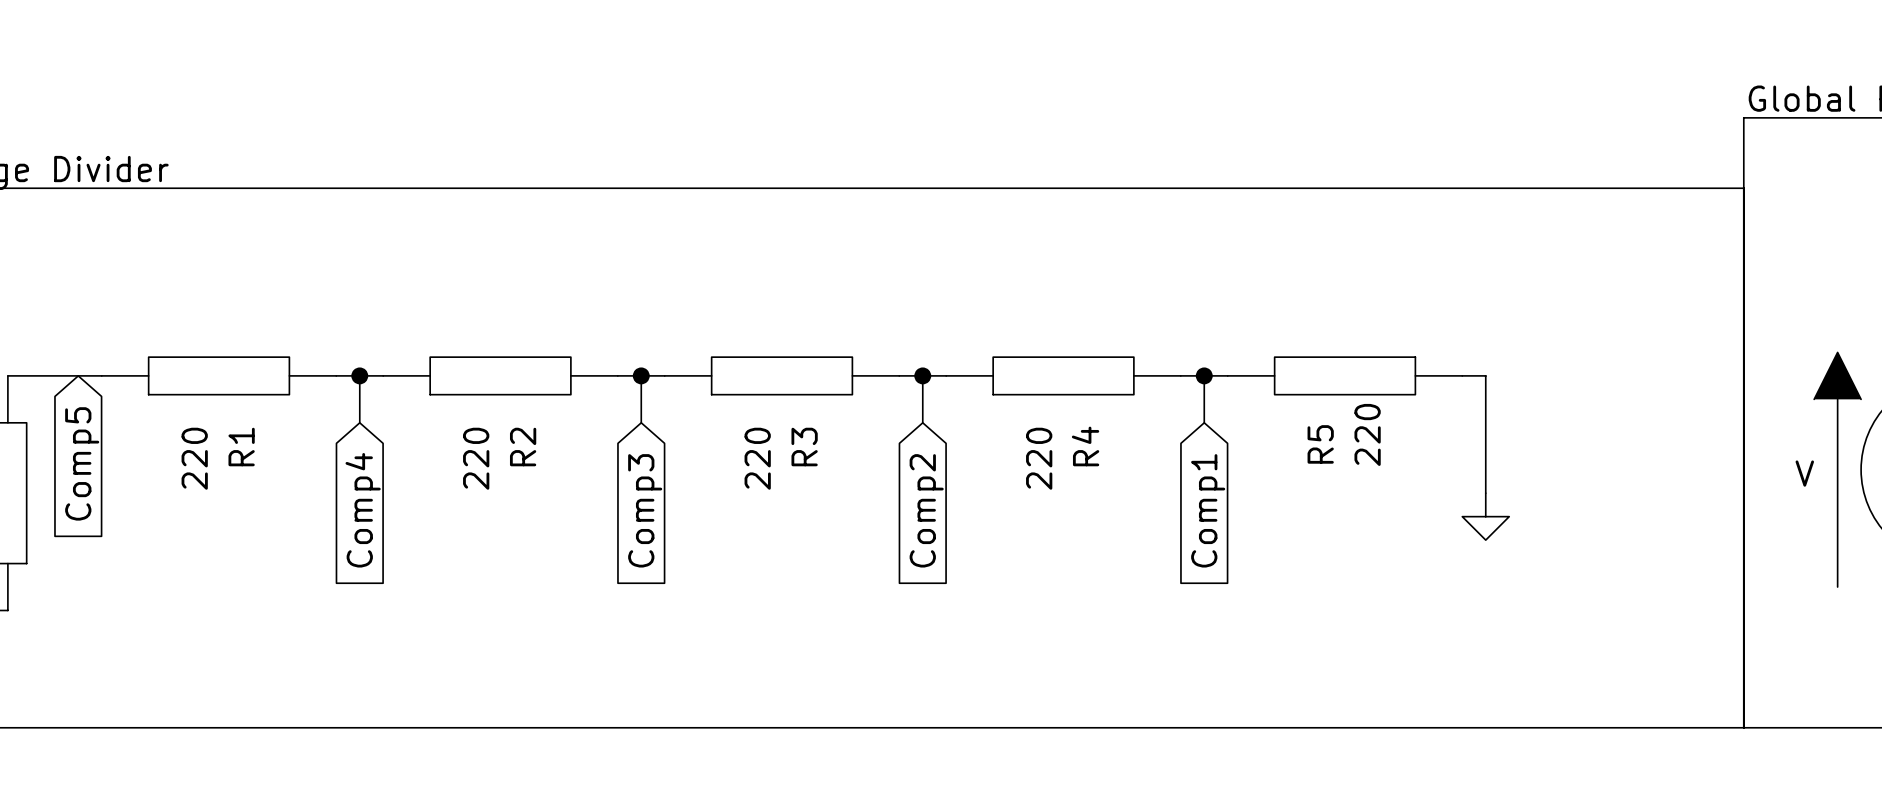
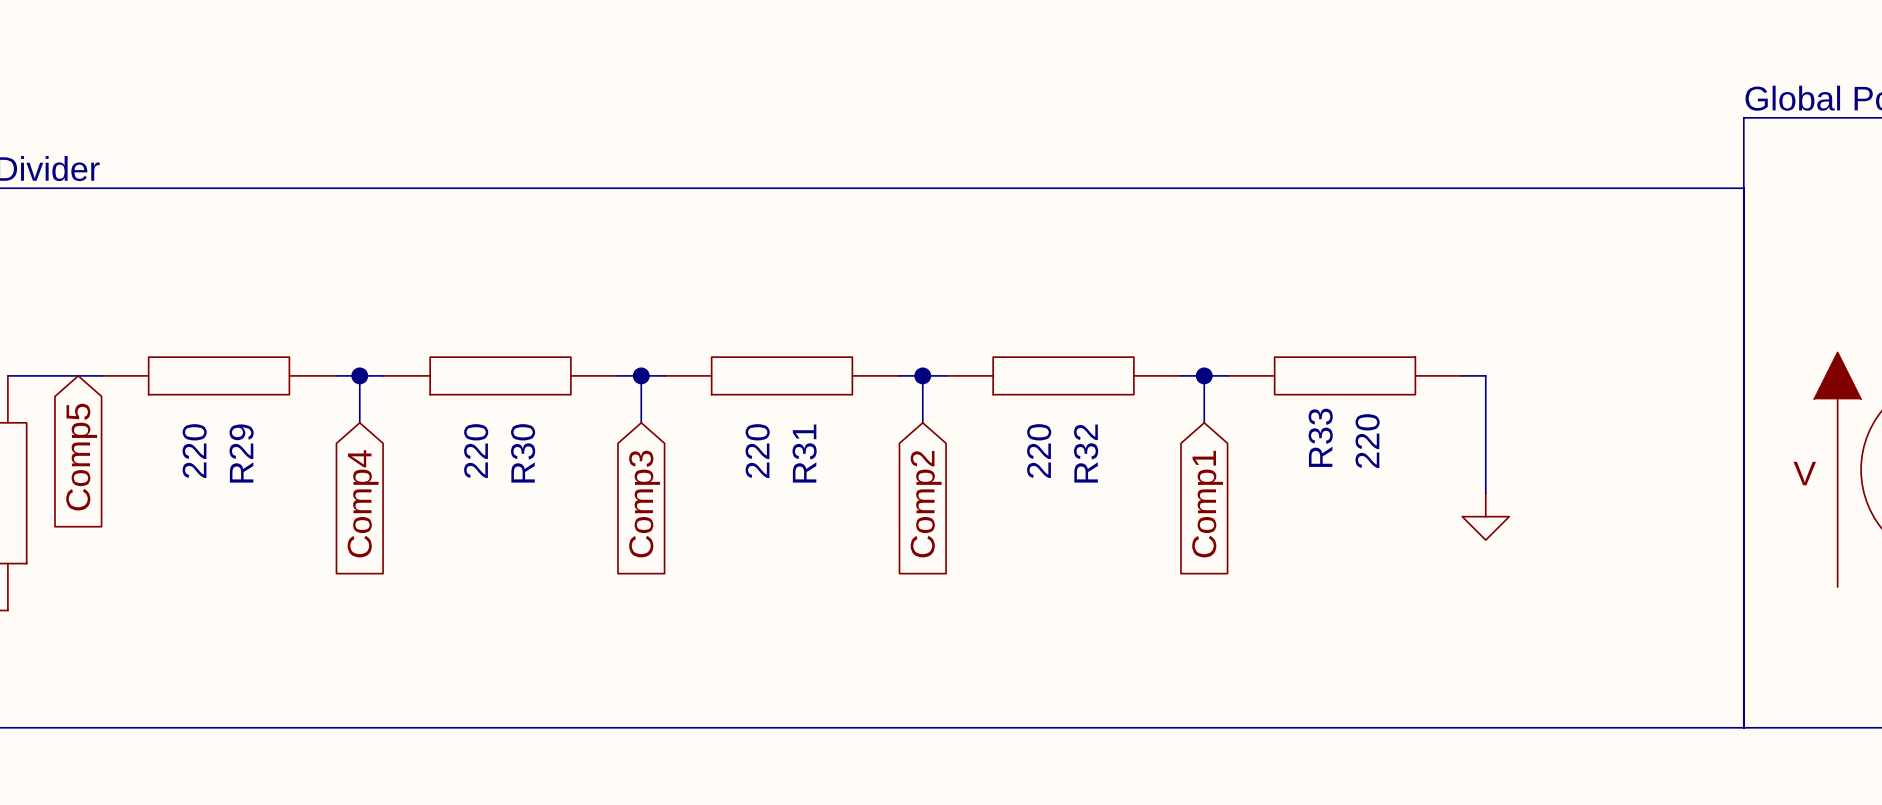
R5 name: R5 (1320, 444) -> R33 (1320, 437)
R4 name: R4 (1085, 446) -> R32 (1086, 453)
R1 name: R1 (241, 447) -> R29 (241, 453)
R2 name: R2 (523, 447) -> R30 (523, 453)
R3 name: R3 (804, 447) -> R31 (804, 453)

